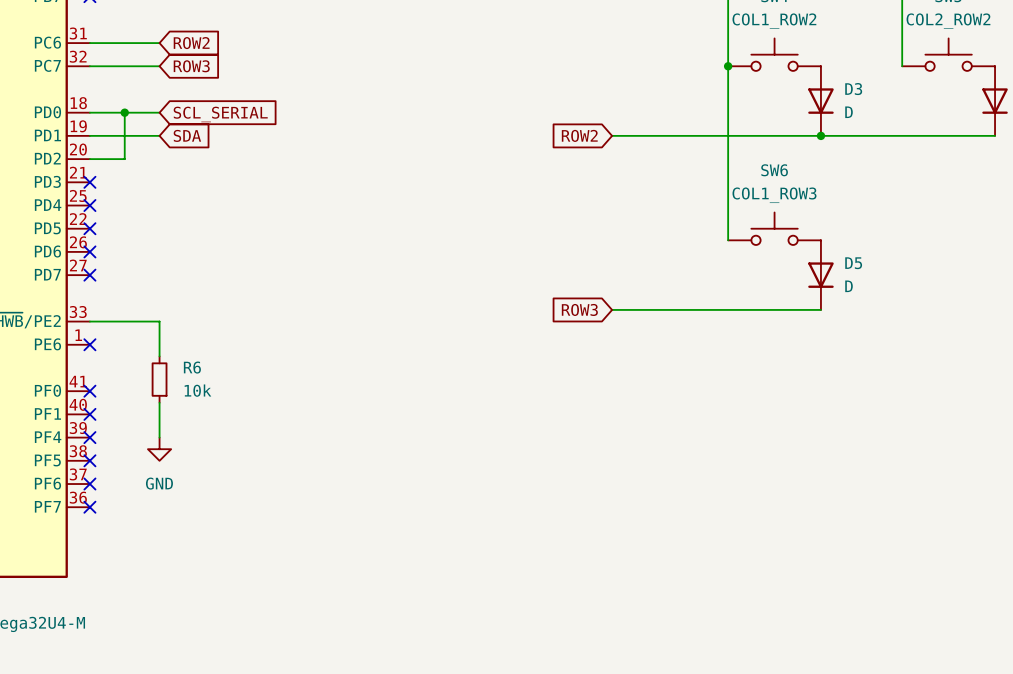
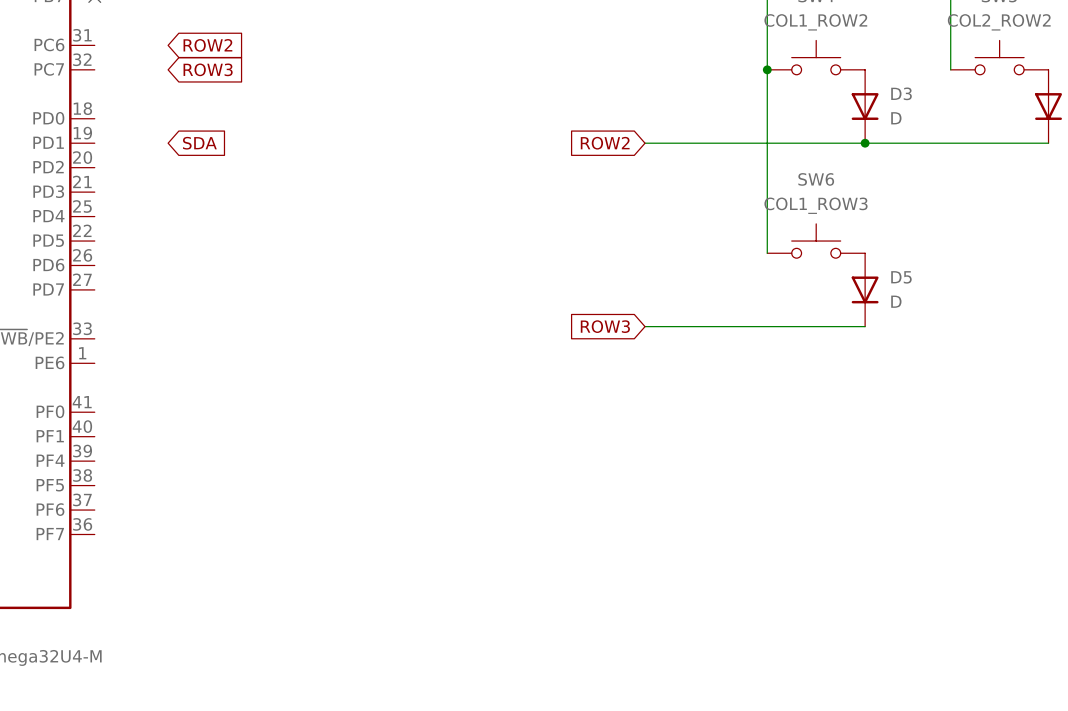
wire: (89, 43) (159, 43) -> none
wire: (89, 66) (159, 66) -> none
wire: (89, 112) (159, 112) -> none
wire: (124, 112) (124, 159) (89, 159) -> none
junction: (124, 112) -> none
global label: SCL_SERIAL (220, 114) -> none
wire: (89, 135) (159, 135) -> none
no-connect mark: (89, 182) -> none
no-connect mark: (89, 205) -> none
no-connect mark: (89, 228) -> none
no-connect mark: (89, 251) -> none
no-connect mark: (89, 275) -> none
wire: (89, 321) (159, 321) (159, 356) -> none
no-connect mark: (89, 344) -> none
R6: 10k (159, 379) -> none
no-connect mark: (89, 391) -> none
wire: (159, 402) (159, 437) -> none
no-connect mark: (89, 414) -> none
no-connect mark: (89, 437) -> none
power symbol: GND (159, 449) -> none
no-connect mark: (89, 460) -> none
no-connect mark: (89, 484) -> none
no-connect mark: (89, 507) -> none

